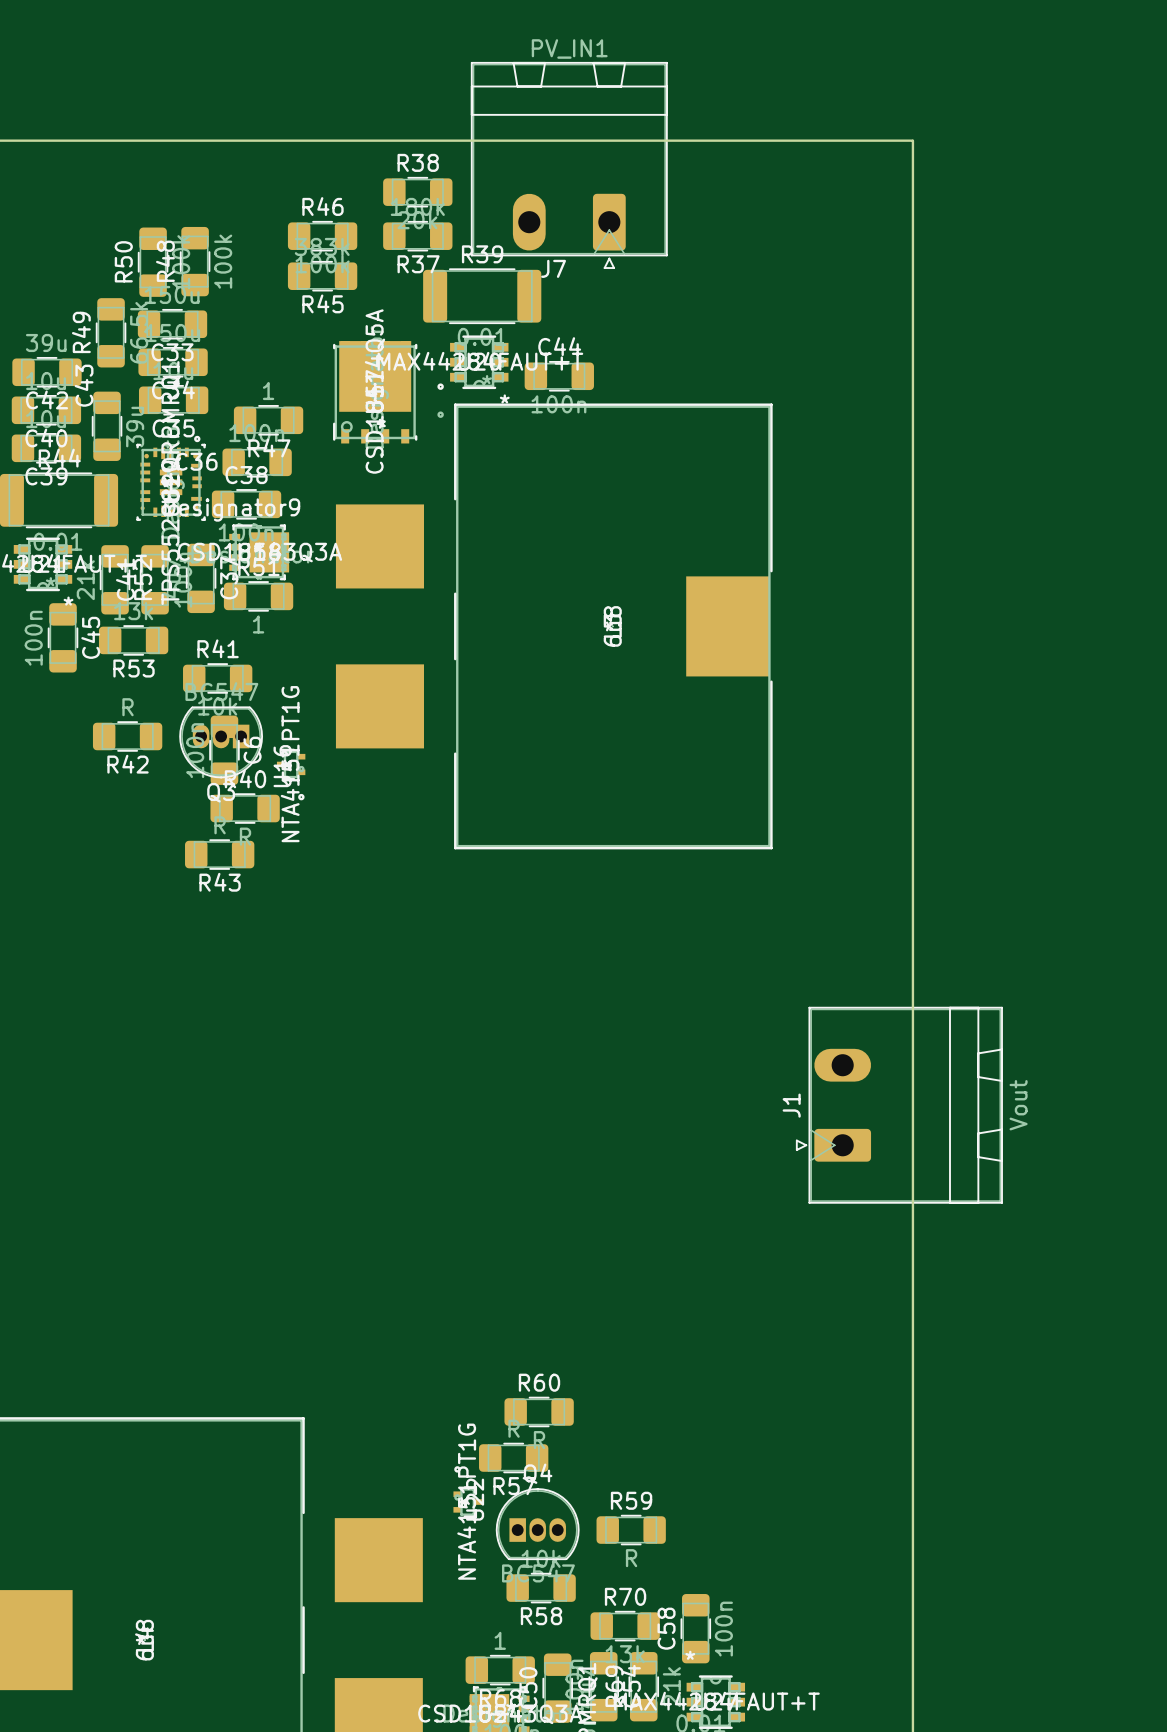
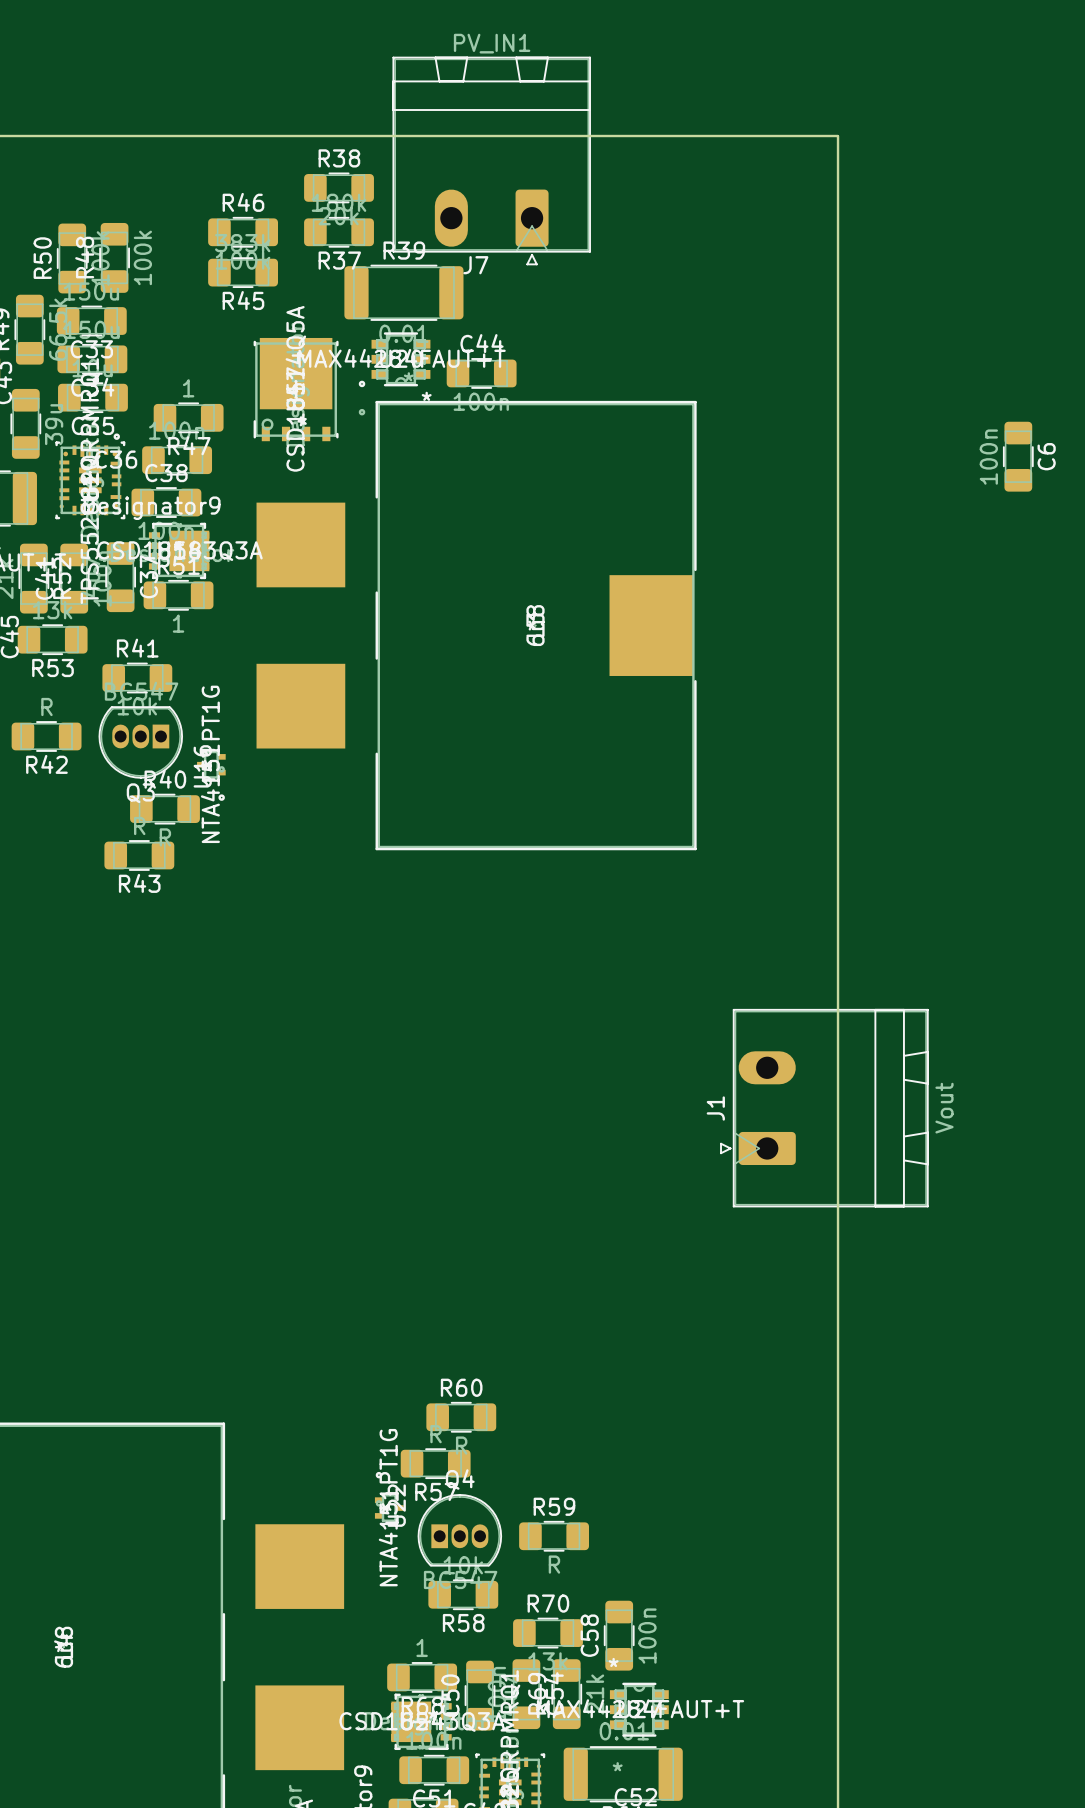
C6 position: (224, 750) -> (1018, 456)

